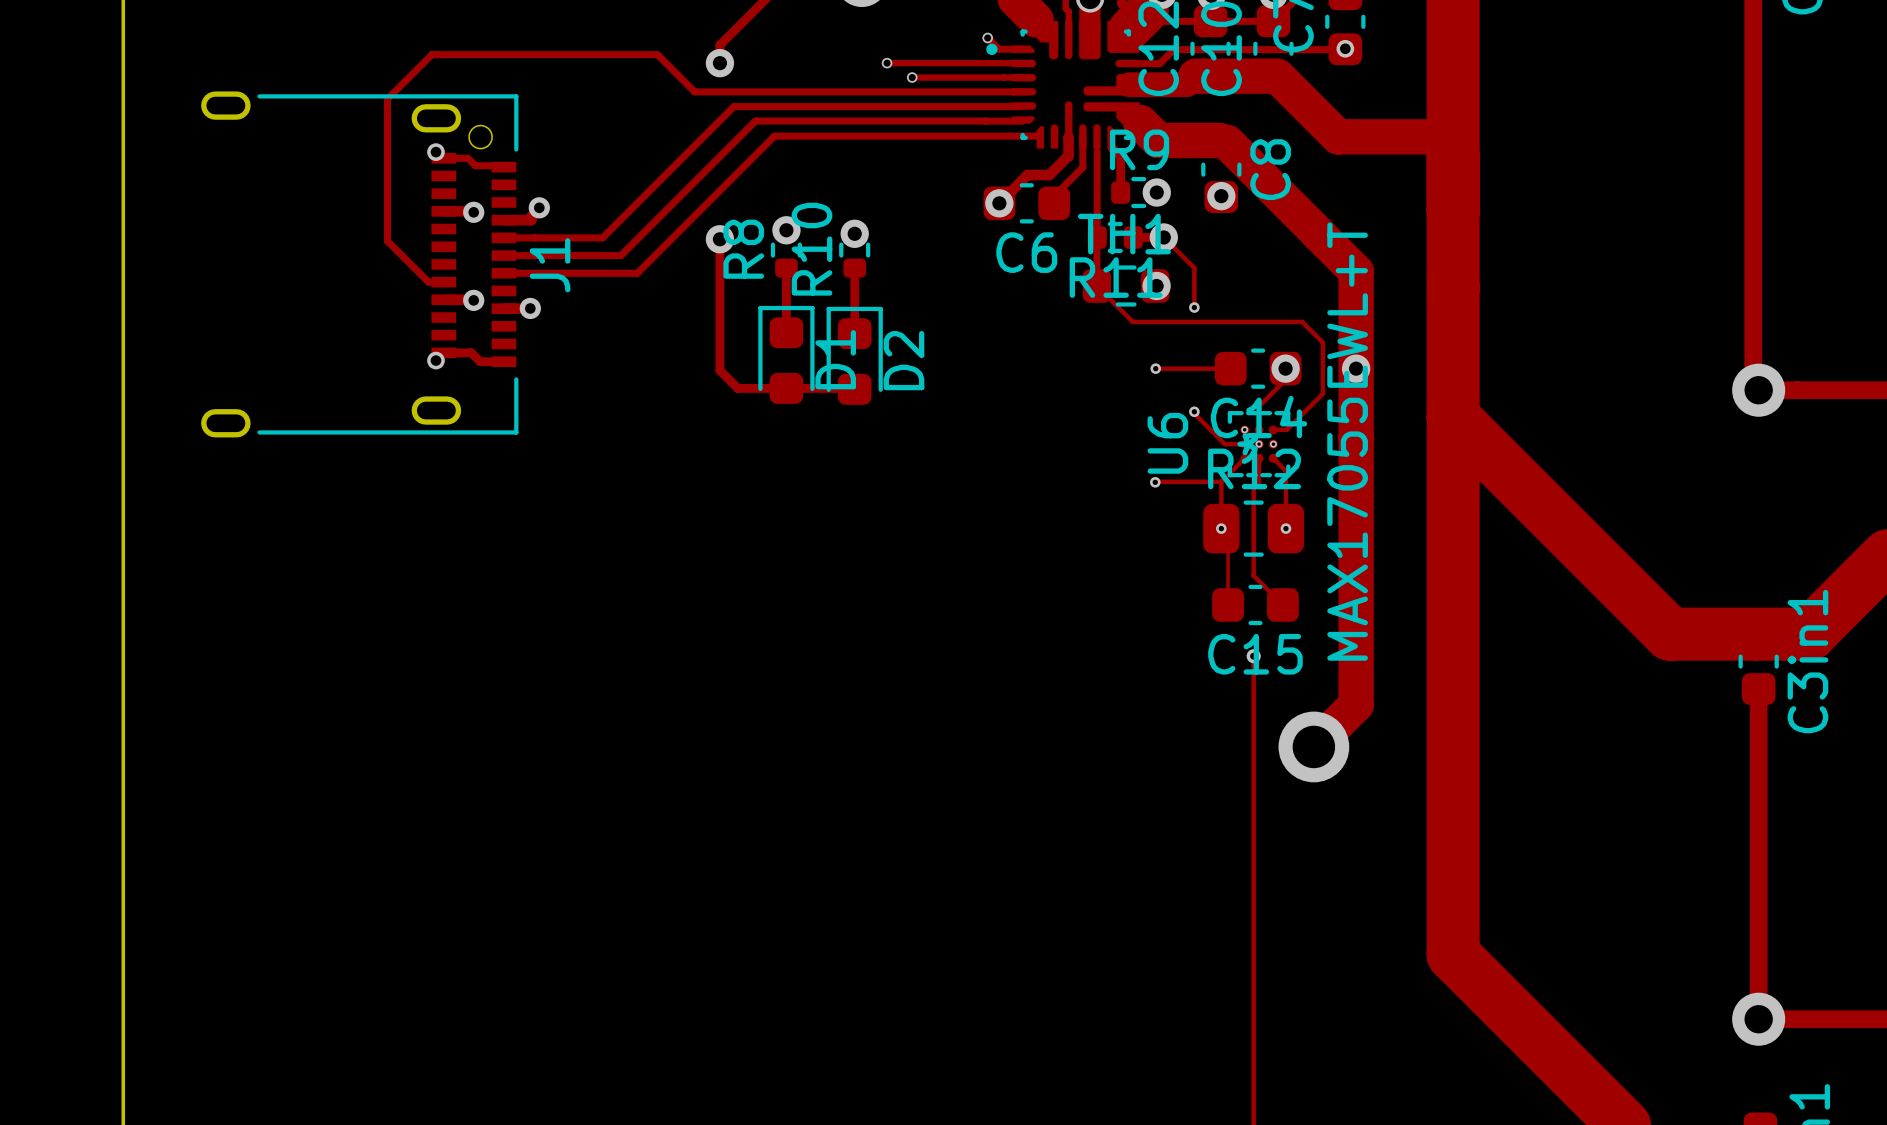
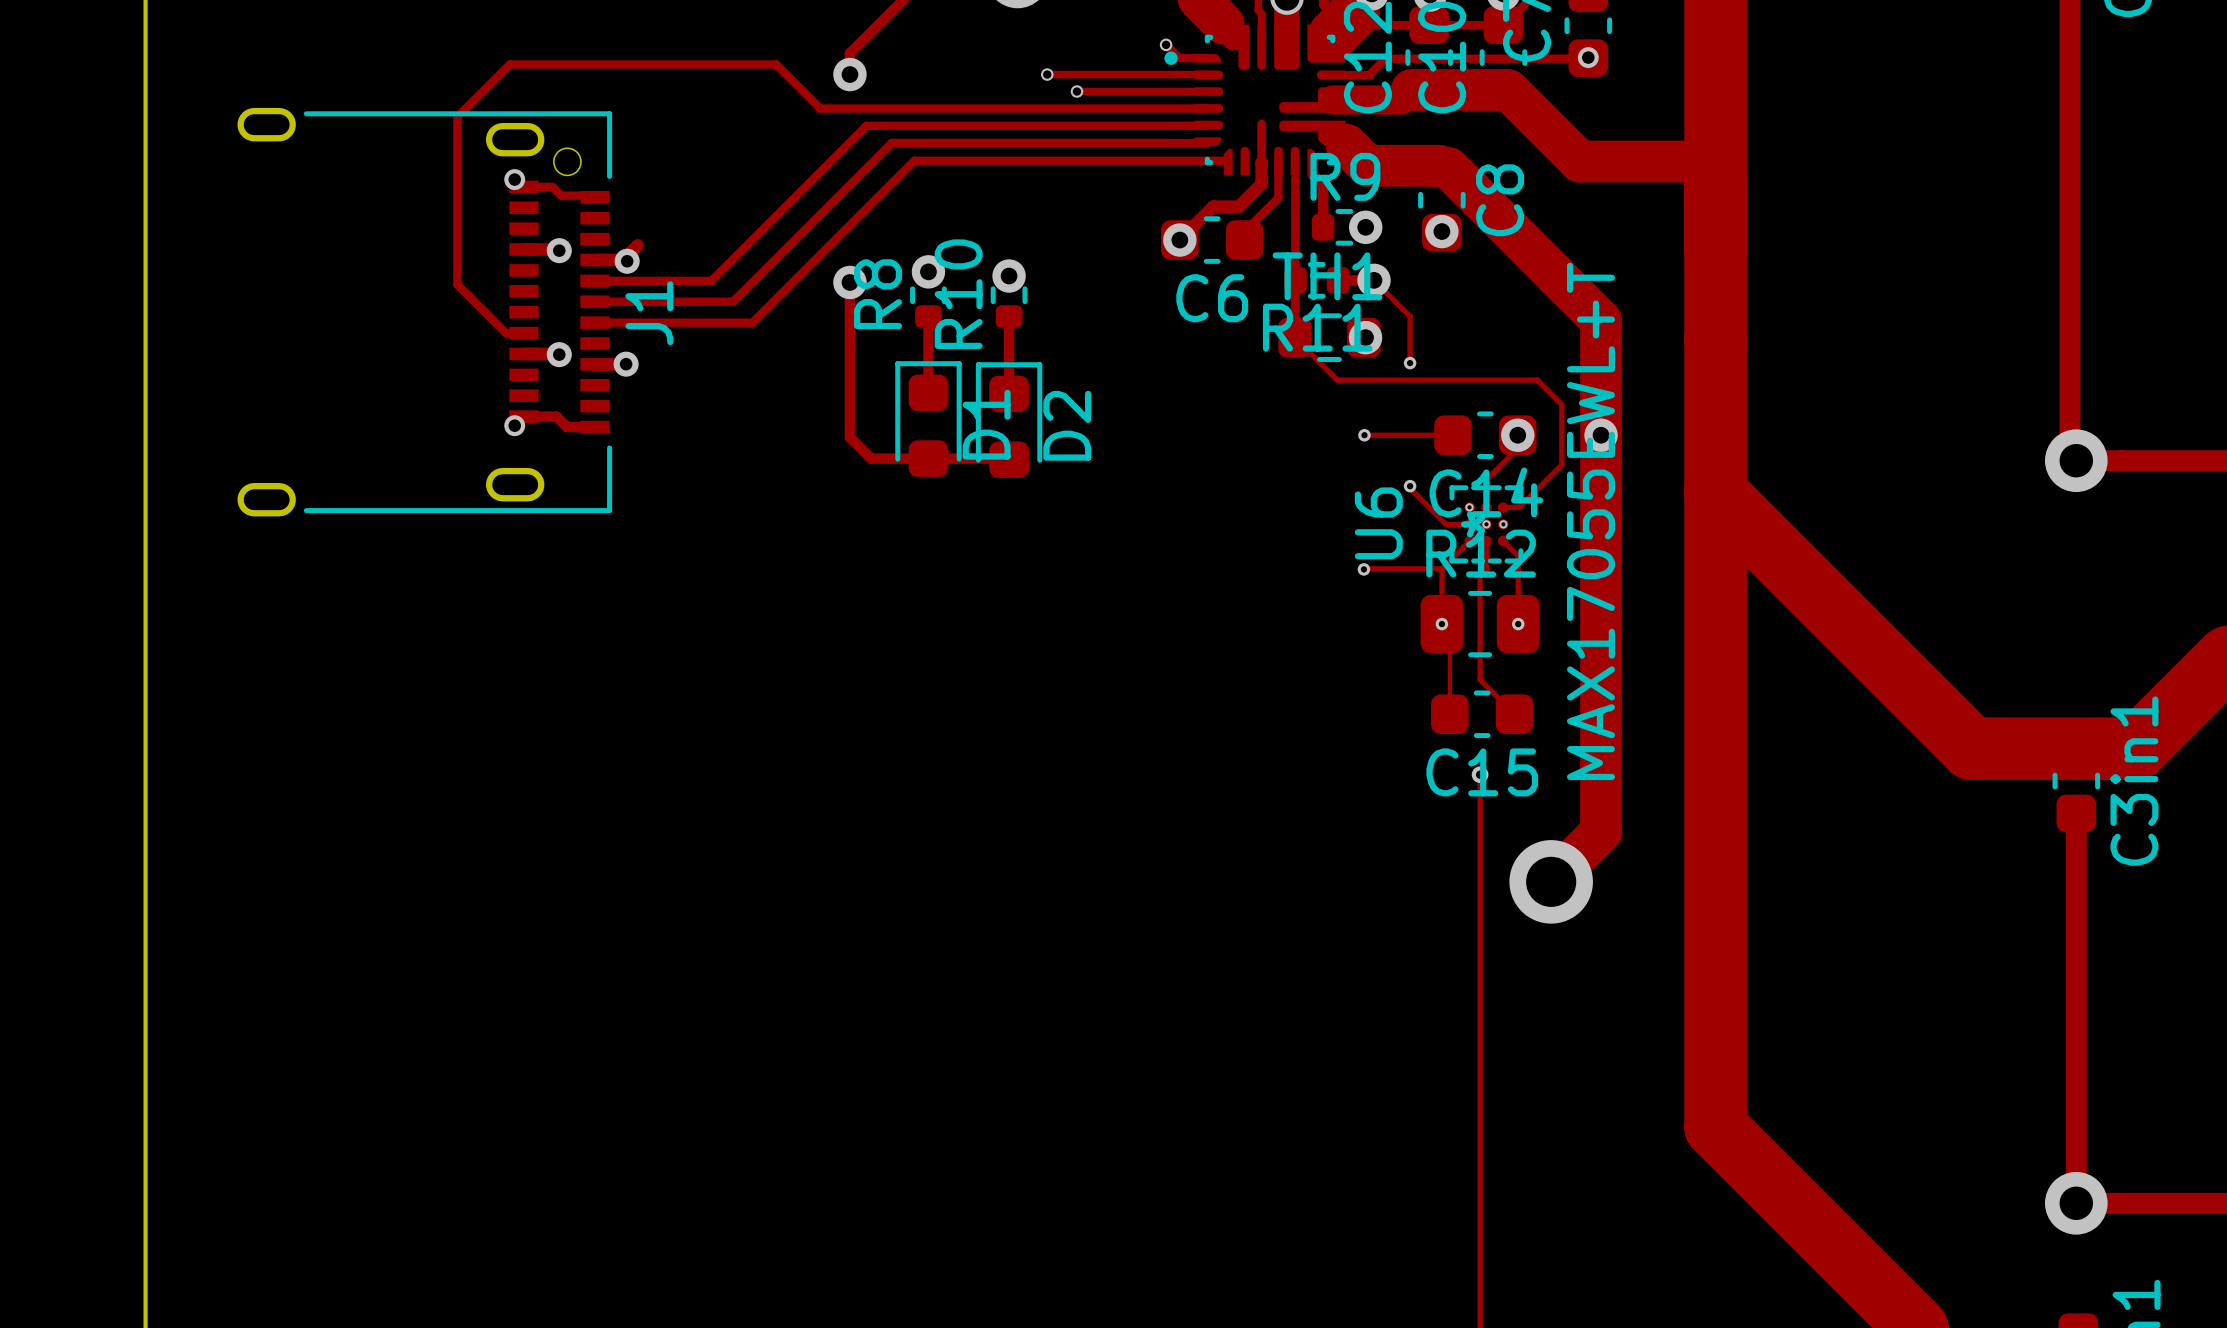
via position: (539, 207) -> (627, 261)

